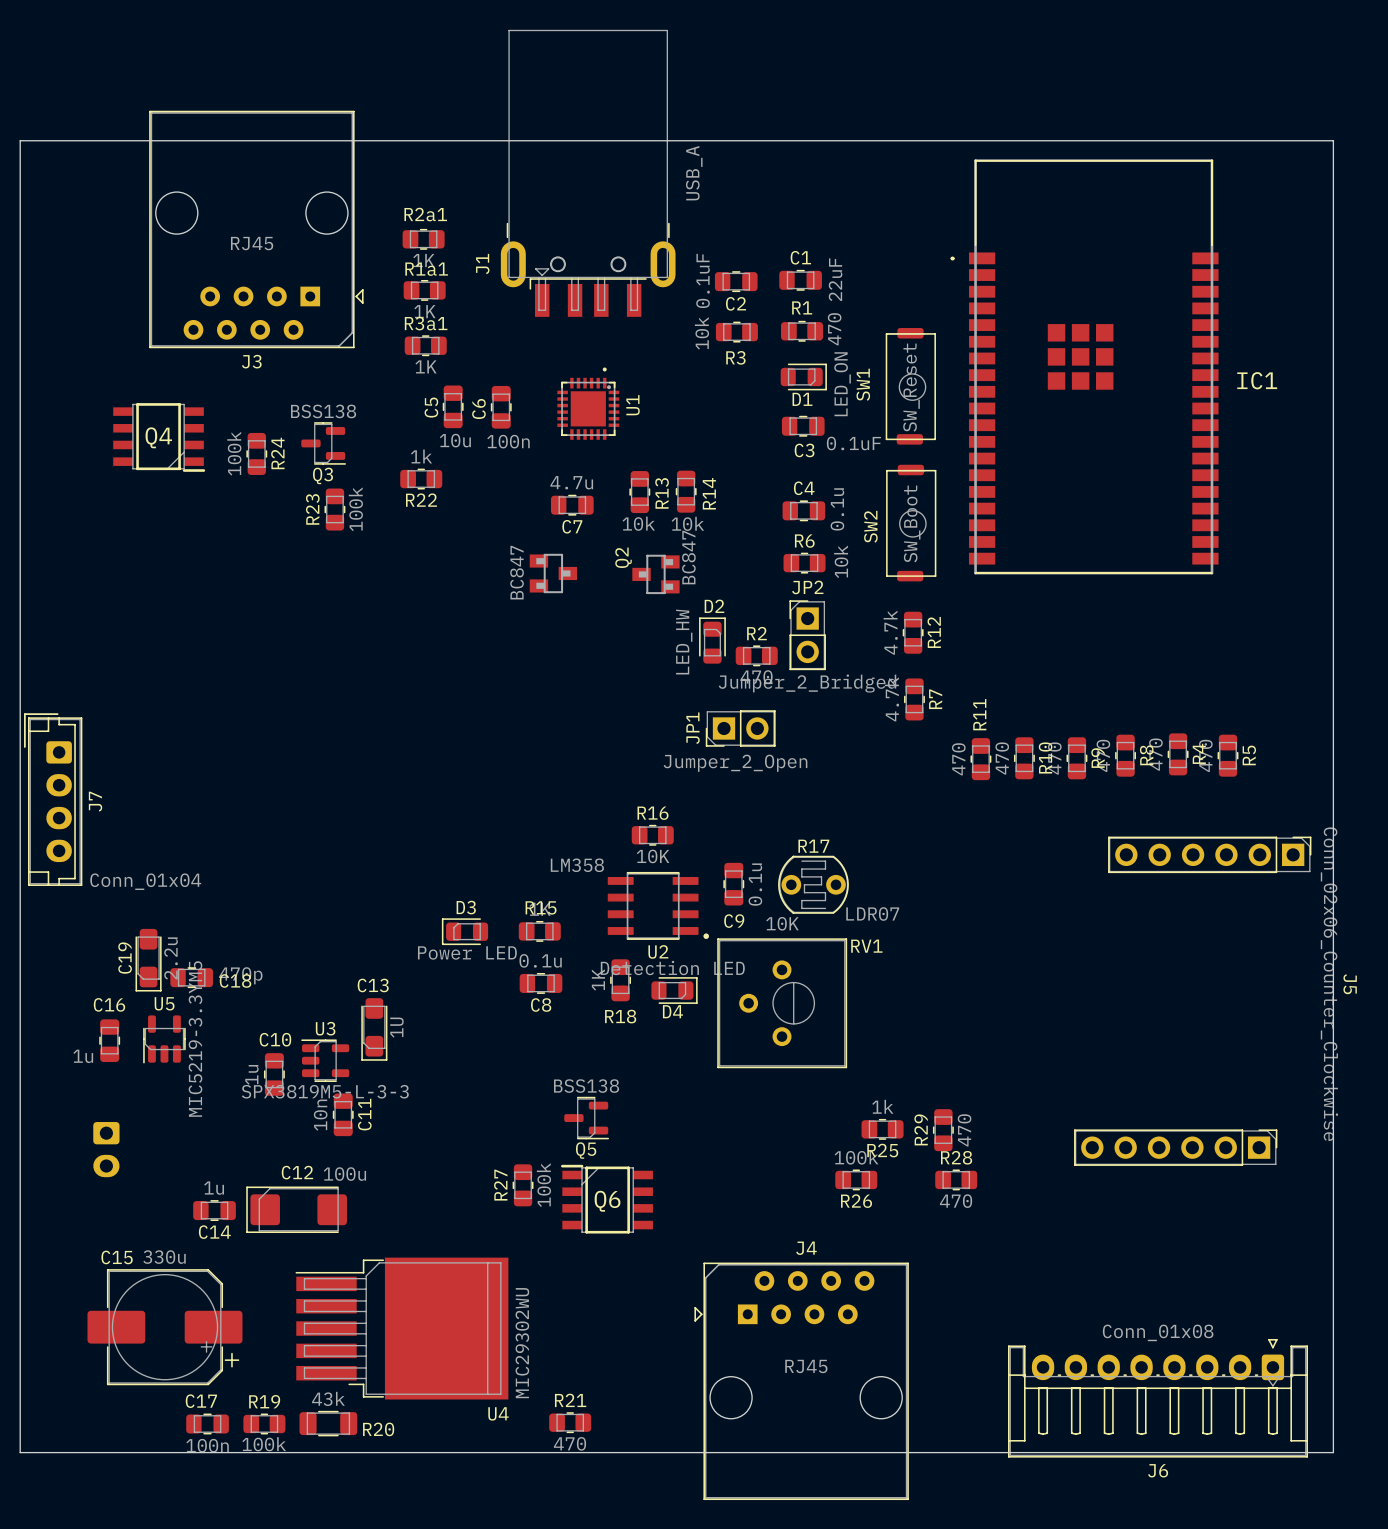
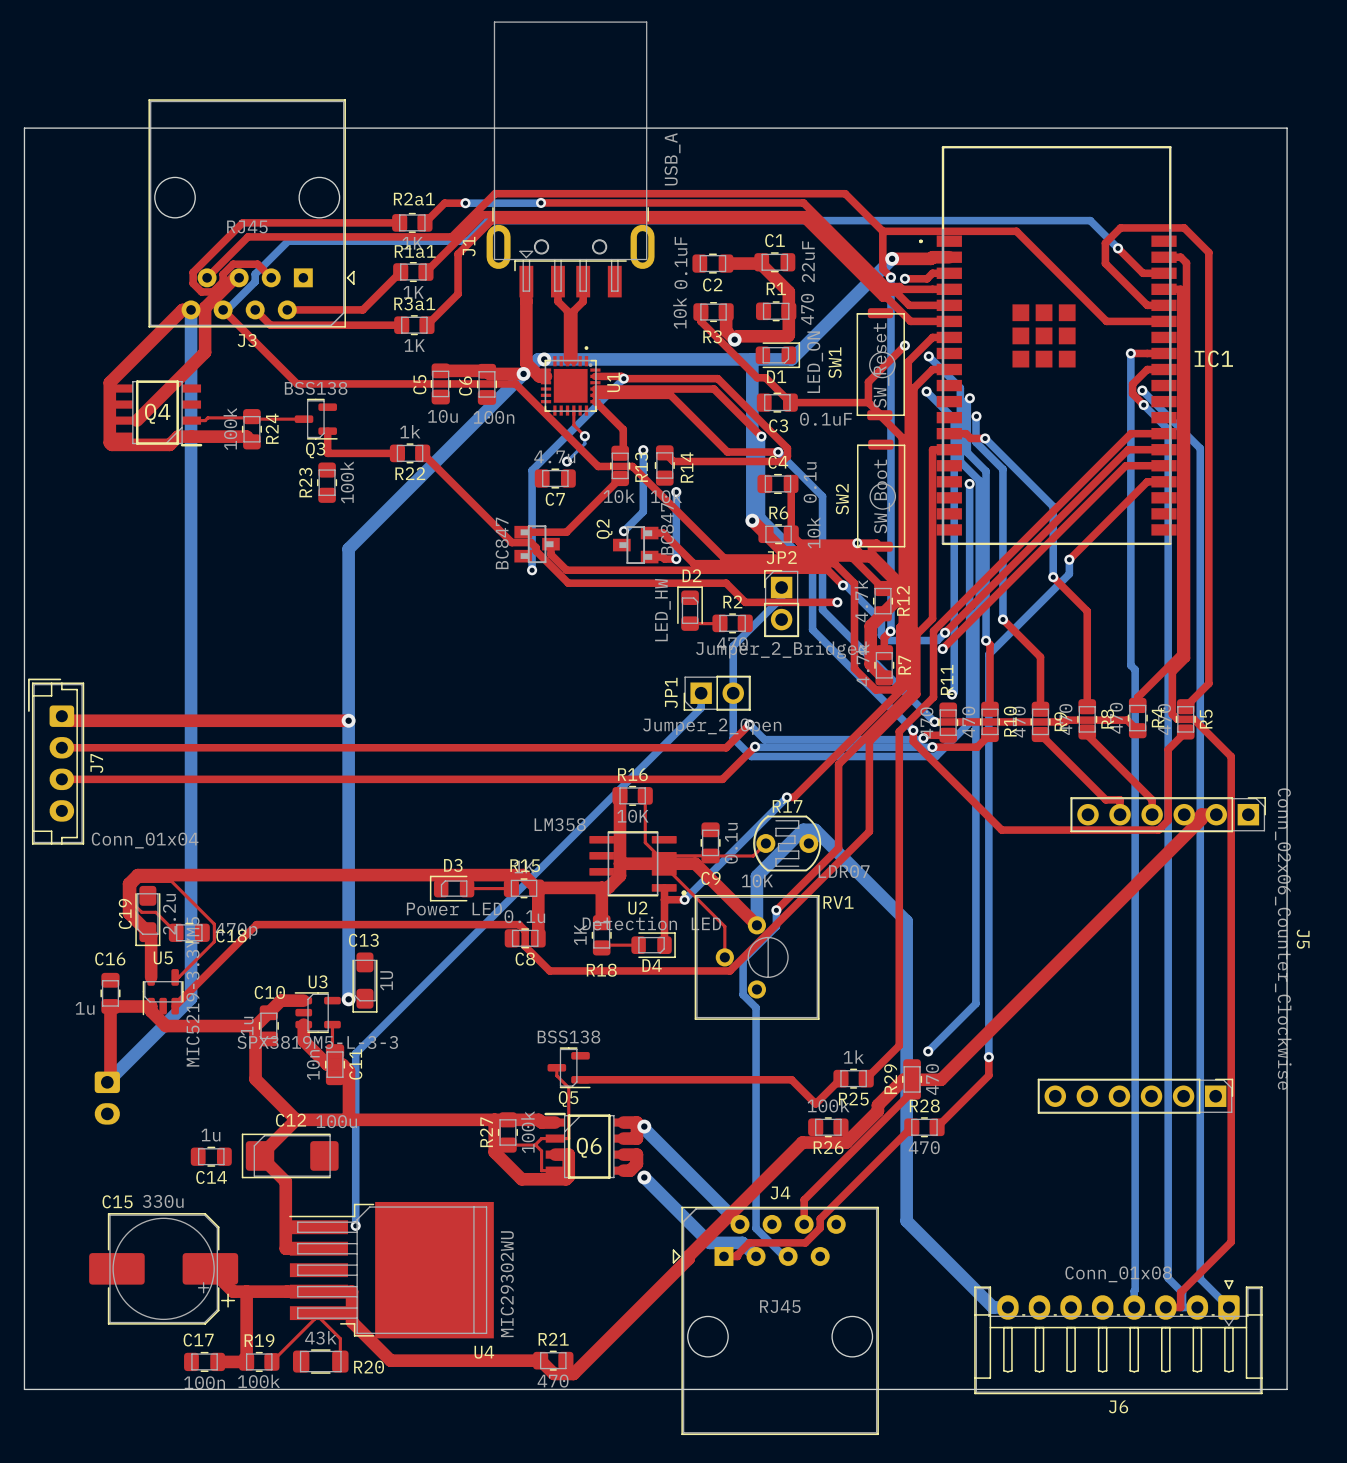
top track: none -> (465, 203) (444, 203) (424, 222)
via: none -> (465, 203)
top track: none -> (541, 202) (803, 202) (887, 286) (899, 286) (902, 289) (949, 289)
bottom track: none -> (541, 202) (465, 203)
via: none -> (541, 202)
top track: none -> (399, 222) (242, 222) (193, 272) (193, 283) (201, 291) (212, 291) (223, 281) (223, 274) (233, 264) (257, 264) (271, 277)
top track: none -> (882, 231) (845, 193) (495, 193) (451, 236) (248, 236) (207, 277)
top track: none -> (882, 231) (882, 269) (890, 277)
top track: none -> (882, 231) (1016, 231) (1106, 321) (1164, 321)
top track: none -> (1118, 248) (1142, 273) (1164, 273)
bottom track: none -> (1118, 248) (1090, 220) (488, 220) (467, 241) (288, 241) (255, 274) (255, 281) (227, 309) (223, 309)
via: none -> (1118, 248)
top track: none -> (949, 257) (892, 258)
top track: none -> (1164, 257) (1180, 257) (1186, 263) (1186, 658) (1172, 672) (1172, 714) (1177, 719) (1193, 719) (1231, 756) (1231, 1242) (1180, 1292) (1180, 1307) (1165, 1307)
bottom track: none -> (892, 258) (791, 359) (538, 359) (348, 548) (348, 999)
via: none -> (892, 258)
top track: none -> (726, 263) (760, 263)
top track: none -> (760, 263) (788, 291) (788, 335) (738, 336) (734, 339) (726, 331) (726, 312)
top track: none -> (400, 272) (362, 309) (287, 309)
top track: none -> (425, 272) (483, 214) (807, 214) (884, 292) (896, 292) (909, 305) (949, 305)
top track: none -> (949, 273) (932, 273) (927, 278) (904, 278)
top track: none -> (239, 277) (235, 277) (205, 307) (205, 352) (136, 420)
bottom track: none -> (890, 277) (890, 631)
via: none -> (890, 277)
via: none -> (904, 278)
top track: none -> (526, 281) (526, 363) (539, 376) (546, 376)
top track: none -> (557, 281) (557, 301) (567, 311) (567, 361)
top track: none -> (583, 281) (583, 301) (573, 310) (573, 361)
top track: none -> (1164, 289) (1180, 289) (1180, 654) (1137, 697) (1137, 705)
top track: none -> (1164, 305) (1147, 305) (1105, 263) (1105, 243) (1120, 227) (1184, 227) (1208, 252) (1208, 683) (1185, 706)
top track: none -> (191, 309) (182, 309) (109, 382) (109, 442) (111, 444) (169, 444) (177, 436) (246, 436) (251, 441)
bottom track: none -> (191, 309) (191, 998) (107, 1082)
top track: none -> (223, 309) (297, 383) (515, 383) (598, 466) (632, 466) (724, 558) (852, 558) (883, 588)
top track: none -> (255, 309) (270, 325) (401, 325)
top track: none -> (700, 312) (700, 321) (757, 377) (765, 377) (790, 402) (868, 402)
top track: none -> (949, 321) (910, 321) (887, 297) (882, 297) (804, 220) (491, 220) (458, 254) (458, 294) (426, 325)
top track: none -> (949, 337) (932, 337) (908, 361) (908, 626) (905, 629) (905, 685) (793, 797) (786, 797)
via: none -> (734, 339)
top track: none -> (904, 345) (868, 382) (868, 402)
via: none -> (904, 345)
top track: none -> (1130, 353) (1164, 353)
bottom track: none -> (1130, 353) (1130, 665) (1135, 669) (1134, 1307)
via: none -> (1130, 353)
bottom track: none -> (928, 356) (960, 387) (960, 461) (979, 480) (979, 609) (975, 613) (975, 1003) (928, 1051)
via: none -> (928, 356)
via: none -> (544, 359)
bottom track: none -> (752, 359) (752, 520)
top track: none -> (949, 369) (932, 369) (913, 388) (913, 629) (911, 632) (911, 692) (838, 764) (838, 848) (776, 910)
top track: none -> (1164, 369) (1147, 369) (1132, 384) (1132, 393) (1143, 405)
top track: none -> (440, 370) (486, 370) (489, 373) (523, 373)
via: none -> (523, 373)
top track: none -> (595, 376) (621, 376) (623, 378) (717, 378) (787, 448) (787, 456) (782, 461) (673, 461) (664, 452)
bottom track: none -> (623, 378) (532, 470) (532, 570)
via: none -> (623, 378)
top track: none -> (595, 389) (713, 389) (761, 436)
bottom track: none -> (1142, 390) (1200, 448) (1200, 1278) (1228, 1307)
via: none -> (1142, 390)
bottom track: none -> (926, 391) (954, 419) (954, 692) (952, 694)
via: none -> (926, 391)
top track: none -> (595, 395) (670, 395) (727, 452) (778, 452)
bottom track: none -> (969, 398) (967, 400) (967, 452) (986, 471) (986, 640)
via: none -> (969, 398)
top track: none -> (595, 401) (623, 429) (623, 450) (620, 453)
top track: none -> (868, 402) (902, 437) (902, 624) (899, 627) (899, 683) (893, 689) (875, 689) (854, 668) (854, 583) (834, 563) (693, 563) (663, 533) (649, 533)
bottom track: none -> (1143, 405) (1168, 429) (1168, 1278) (1182, 1292) (1182, 1307) (1197, 1307)
via: none -> (1143, 405)
top track: none -> (573, 410) (573, 425) (584, 436)
bottom track: none -> (976, 416) (975, 442) (1002, 469) (1002, 619)
via: none -> (976, 416)
top track: none -> (251, 417) (207, 417) (205, 420) (191, 420)
top track: none -> (251, 417) (303, 419)
top track: none -> (327, 431) (327, 453) (397, 453)
top track: none -> (949, 433) (966, 433) (970, 438) (985, 438)
top track: none -> (1164, 433) (1130, 433) (933, 631) (933, 697) (899, 731) (899, 1045) (866, 1078)
bottom track: none -> (584, 436) (584, 443) (567, 461)
via: none -> (584, 436)
bottom track: none -> (761, 436) (761, 516) (812, 567) (812, 629) (913, 730)
via: none -> (761, 436)
bottom track: none -> (985, 438) (1053, 506) (1053, 577)
via: none -> (985, 438)
bottom track: none -> (643, 450) (643, 511) (623, 531)
via: none -> (643, 450)
top track: none -> (949, 449) (932, 449) (932, 618) (916, 634) (916, 694) (869, 741) (869, 831) (729, 970) (549, 970) (525, 946) (525, 930) (519, 924) (256, 924) (175, 1006)
top track: none -> (1164, 449) (1128, 449) (945, 632)
bottom track: none -> (778, 452) (822, 496) (822, 609) (934, 721)
via: none -> (778, 452)
top track: none -> (422, 453) (511, 542) (531, 542) (536, 547) (536, 551) (568, 583) (726, 583) (745, 602) (837, 602)
via: none -> (567, 461)
top track: none -> (1164, 465) (1125, 465) (942, 648)
top track: none -> (620, 478) (566, 532) (523, 532)
top track: none -> (1164, 481) (1147, 481) (1069, 559)
top track: none -> (791, 484) (791, 534) (800, 543) (876, 543) (880, 546)
bottom track: none -> (969, 483) (969, 722) (936, 756) (751, 756) (733, 738) (733, 646) (776, 602) (781, 602) (781, 587)
via: none -> (969, 483)
bottom track: none -> (676, 492) (676, 559)
via: none -> (676, 492)
top track: none -> (752, 520) (784, 552) (856, 552) (860, 556) (871, 556) (896, 581) (896, 600) (870, 626) (870, 664) (884, 677)
via: none -> (752, 520)
via: none -> (623, 531)
via: none -> (857, 543)
top track: none -> (550, 544) (550, 554) (566, 570) (827, 570) (843, 585)
top track: none -> (649, 557) (676, 559)
via: none -> (676, 559)
bottom track: none -> (1069, 559) (1069, 573) (988, 654) (988, 1057)
via: none -> (1069, 559)
via: none -> (532, 570)
top track: none -> (1053, 577) (1087, 611) (1087, 706)
via: none -> (1053, 577)
bottom track: none -> (843, 585) (845, 585) (881, 620) (881, 635) (886, 640) (937, 640) (945, 632)
via: none -> (843, 585)
via: none -> (837, 602)
top track: none -> (1002, 619) (1040, 657) (1040, 709)
via: none -> (1002, 619)
top track: none -> (719, 623) (690, 623)
top track: none -> (890, 631) (884, 637) (884, 652)
via: none -> (890, 631)
via: none -> (945, 632)
top track: none -> (986, 640) (989, 644) (989, 709)
via: none -> (986, 640)
via: none -> (942, 648)
bottom track: none -> (701, 693) (701, 708) (355, 1053) (355, 1225)
via: none -> (952, 694)
top track: none -> (61, 716) (66, 720) (348, 720)
via: none -> (348, 720)
top track: none -> (934, 721) (1127, 720) (1137, 730)
via: none -> (934, 721)
top track: none -> (749, 724) (726, 747) (61, 747)
bottom track: none -> (749, 724) (764, 739) (923, 738)
via: none -> (749, 724)
top track: none -> (913, 730) (913, 741) (1001, 830) (1158, 830) (1168, 820) (1168, 749) (1185, 731)
via: none -> (913, 730)
top track: none -> (1087, 731) (1087, 734) (1152, 799) (1152, 814)
top track: none -> (989, 734) (977, 747) (932, 747)
top track: none -> (1040, 734) (1105, 799) (1120, 799) (1120, 814)
top track: none -> (948, 735) (926, 735) (923, 738)
via: none -> (923, 738)
top track: none -> (755, 746) (722, 779) (61, 779)
bottom track: none -> (755, 746) (932, 747)
via: none -> (755, 746)
via: none -> (932, 747)
top track: none -> (620, 795) (620, 875) (608, 887) (536, 888)
top track: none -> (645, 795) (645, 842) (658, 855) (753, 856) (765, 843)
bottom track: none -> (786, 797) (684, 899)
via: none -> (786, 797)
top track: none -> (1216, 814) (1201, 814) (1201, 819) (941, 1079) (903, 1079) (877, 1105) (877, 1111) (846, 1142) (802, 1142) (573, 1374) (553, 1374) (540, 1360) (390, 1360) (352, 1322) (352, 1291) (233, 1291) (210, 1268)
top track: none -> (620, 863) (695, 863) (756, 925)
top track: none -> (664, 871) (670, 871) (724, 926) (724, 957)
top track: none -> (601, 887) (601, 922)
top track: none -> (664, 887) (664, 945)
top track: none -> (511, 888) (467, 888)
top track: none -> (664, 899) (684, 899)
via: none -> (684, 899)
bottom track: none -> (776, 910) (776, 926) (743, 959) (743, 994) (756, 1007) (756, 1228) (784, 1256) (788, 1256)
via: none -> (776, 910)
bottom track: none -> (756, 925) (756, 876) (803, 829) (815, 829) (906, 921) (906, 1221) (993, 1307) (1007, 1307)
top track: none -> (176, 932) (155, 912) (141, 912) (134, 905) (134, 886) (139, 881) (171, 881) (214, 924) (214, 941) (178, 977) (175, 977)
top track: none -> (538, 938) (538, 889) (523, 875) (137, 875) (129, 883) (129, 913) (151, 935) (151, 977)
top track: none -> (638, 945) (604, 945) (601, 947)
via: none -> (348, 999)
top track: none -> (303, 1000) (280, 1000) (255, 1026)
top track: none -> (303, 1024) (303, 1040) (327, 1064) (342, 1064) (348, 1071) (348, 1119)
top track: none -> (332, 1024) (332, 1048) (335, 1051)
top track: none -> (255, 1026) (166, 1026) (151, 1011) (151, 1006) (110, 1006) (110, 1079) (107, 1082)
top track: none -> (255, 1026) (255, 1079) (296, 1119)
via: none -> (928, 1051)
top track: none -> (988, 1057) (988, 1075) (937, 1127)
via: none -> (988, 1057)
top track: none -> (556, 1067) (556, 1075) (568, 1087) (568, 1138) (541, 1138) (535, 1145)
top track: none -> (840, 1078) (815, 1103) (791, 1079) (580, 1079)
top track: none -> (912, 1092) (804, 1199) (804, 1224)
top track: none -> (296, 1119) (538, 1119) (541, 1122) (555, 1122)
top track: none -> (296, 1119) (260, 1155) (285, 1181) (285, 1248) (318, 1248)
top track: none -> (494, 1119) (494, 1152) (521, 1179) (566, 1179) (568, 1176) (568, 1154) (555, 1154)
top track: none -> (623, 1122) (636, 1122) (636, 1138) (623, 1138)
bottom track: none -> (644, 1126) (740, 1224)
via: none -> (644, 1126)
top track: none -> (911, 1127) (820, 1218) (820, 1228) (805, 1242) (749, 1242) (737, 1256) (723, 1256)
top track: none -> (507, 1145) (535, 1145)
top track: none -> (535, 1145) (541, 1151) (541, 1170) (555, 1170)
top track: none -> (623, 1154) (636, 1154) (636, 1163) (630, 1170) (623, 1170)
bottom track: none -> (644, 1177) (709, 1242) (742, 1242) (756, 1256)
via: none -> (644, 1177)
via: none -> (355, 1225)
top track: none -> (246, 1291) (246, 1361) (217, 1361)
top track: none -> (314, 1313) (314, 1319) (271, 1361)
top track: none -> (314, 1313) (340, 1338) (340, 1361)

